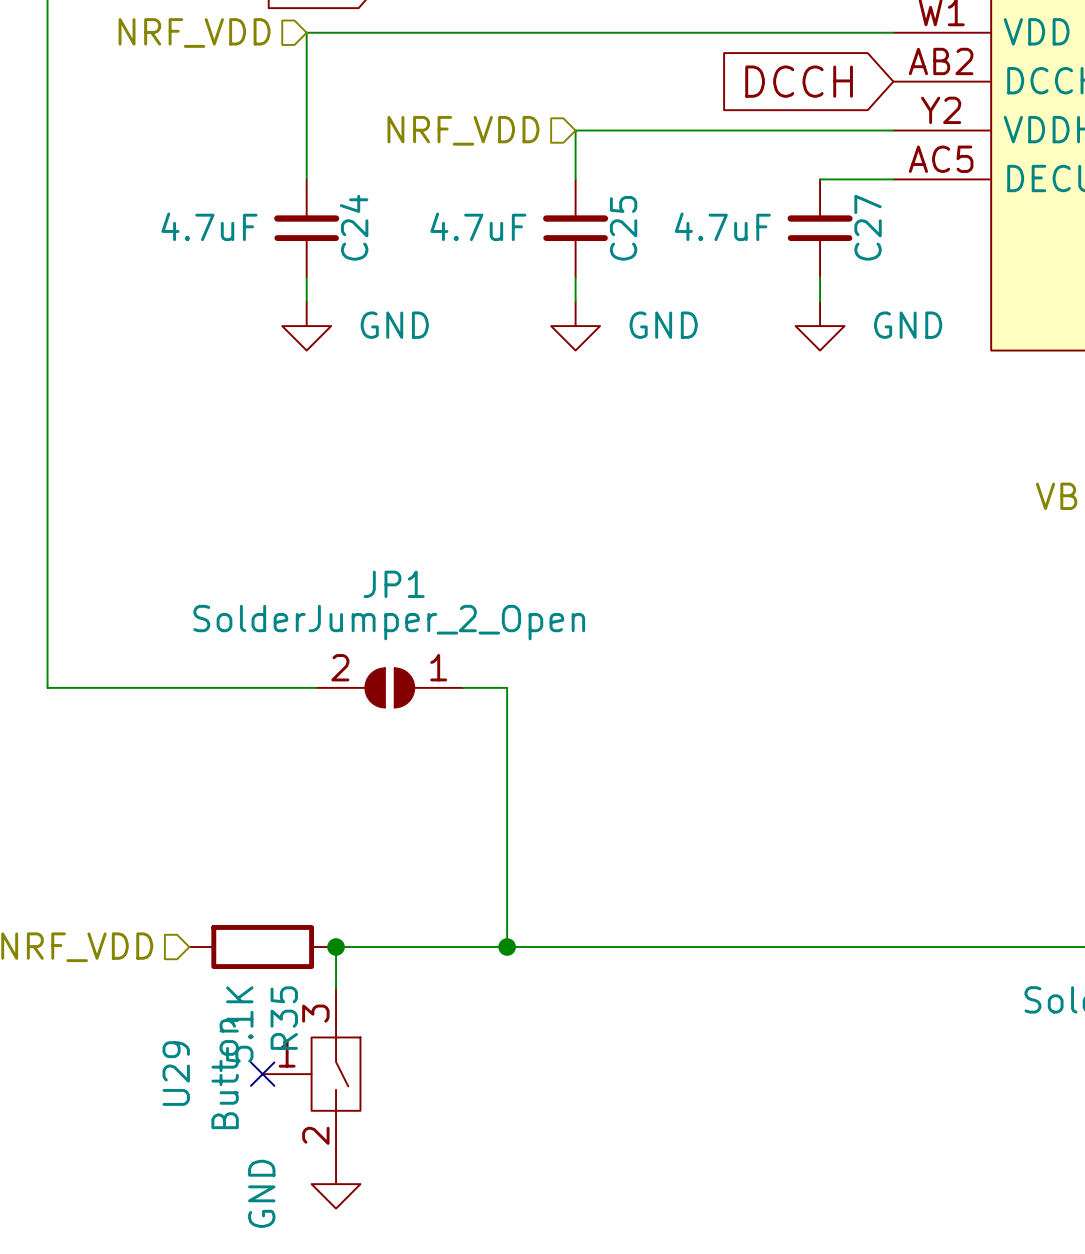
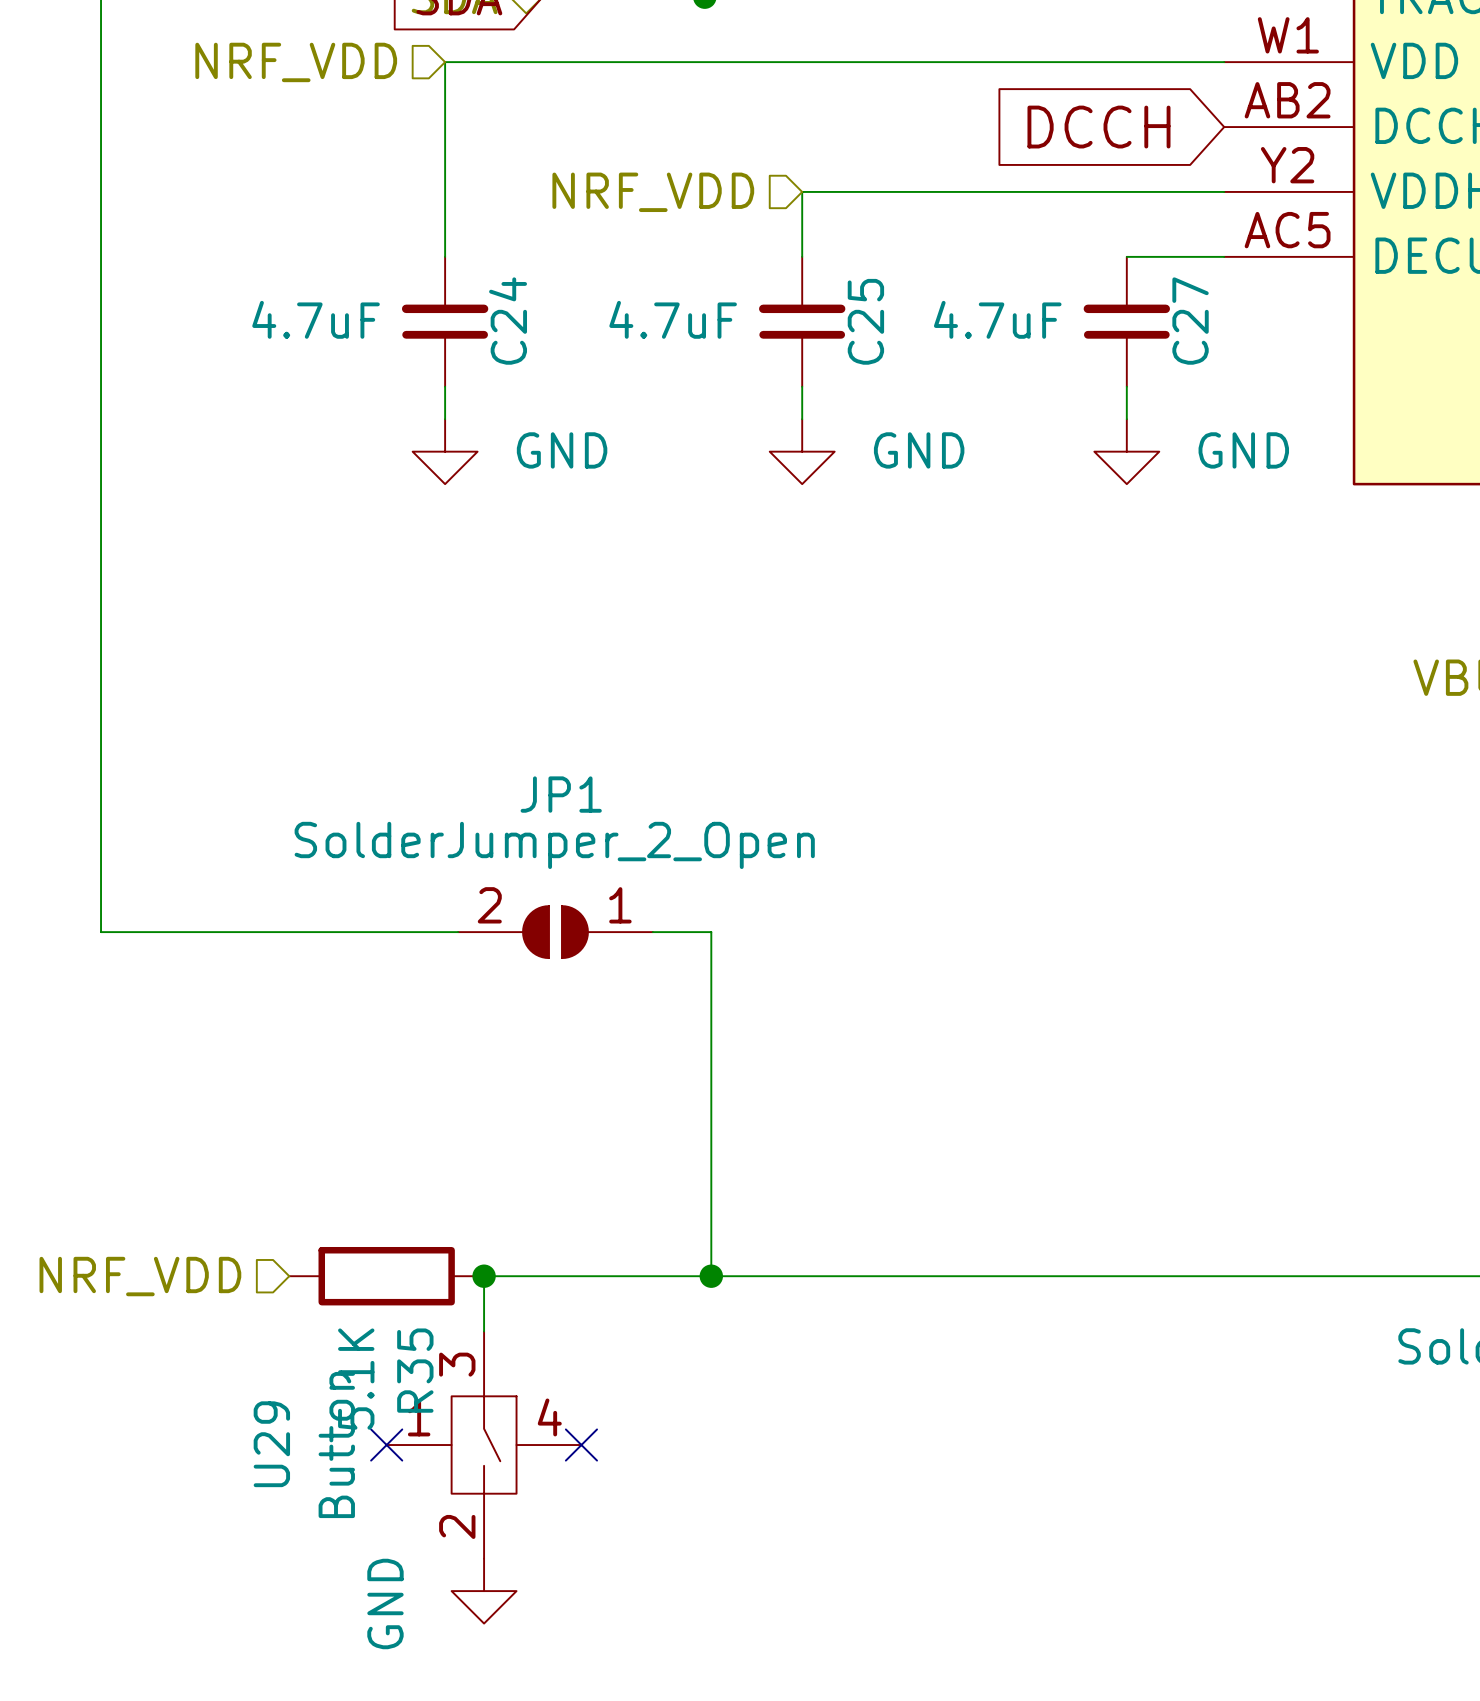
U29 symbol: [262, 988, 361, 1160] -> [386, 1331, 582, 1559]
no-connect mark: none -> (581, 1445)

